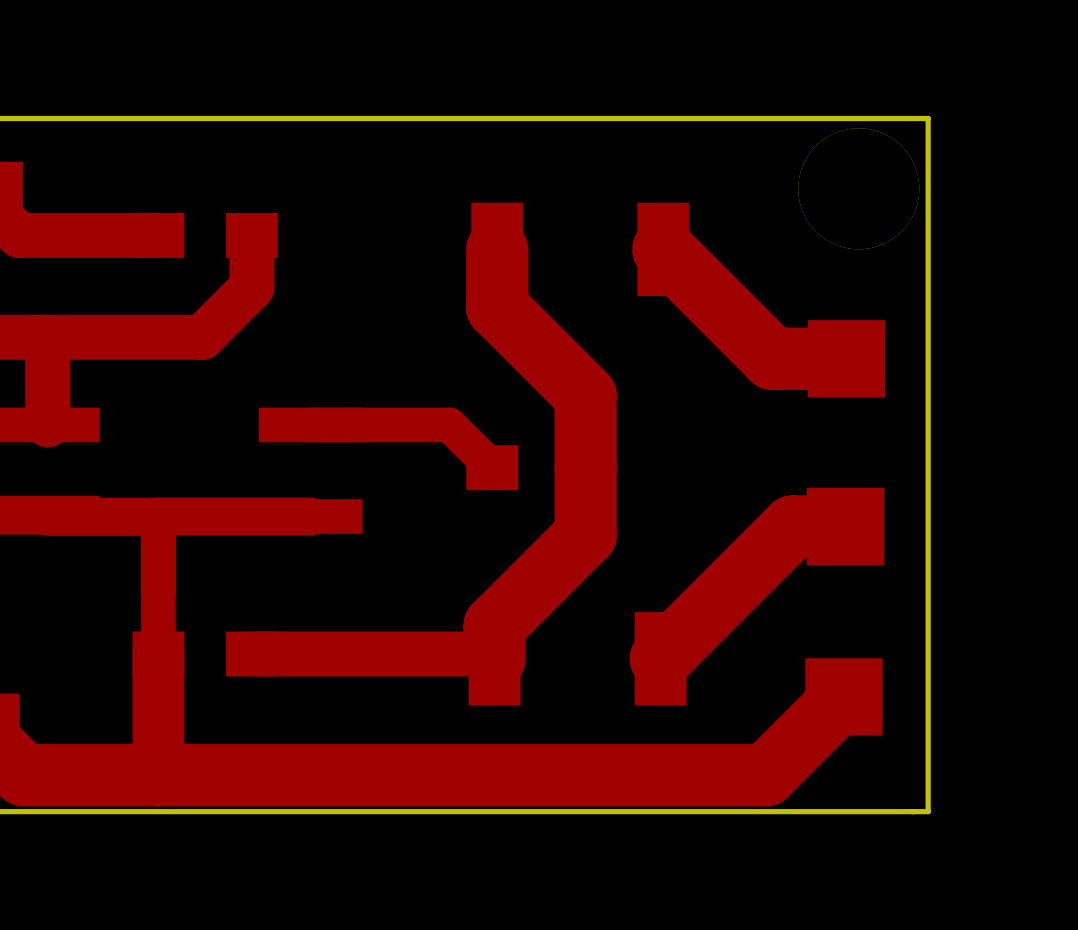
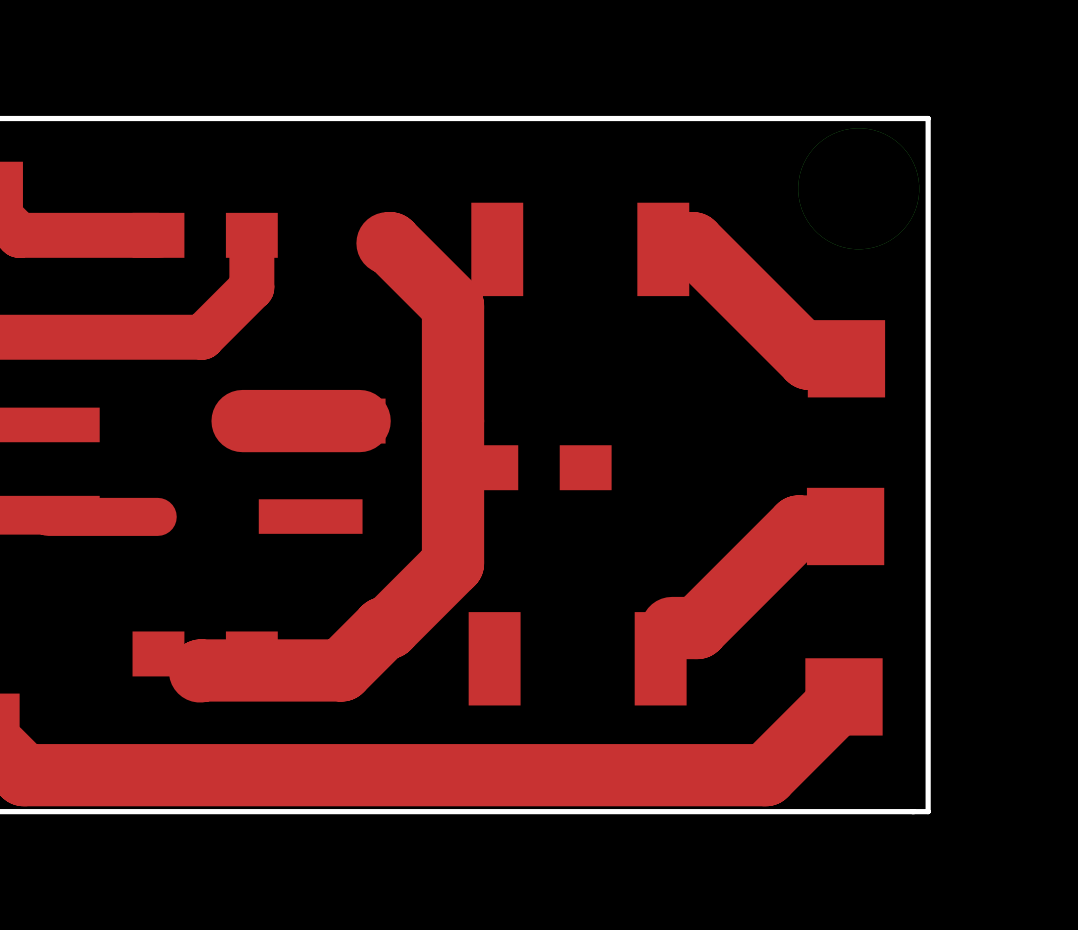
top track: none -> (387, 243) (390, 243) (453, 305) (453, 563) (388, 628) (383, 628) (341, 670) (200, 671)
top track: (497, 249) (497, 307) (585, 395) (585, 534) (494, 625) (494, 658) -> none
top track: (663, 249) (772, 358) (808, 358) -> (671, 243) (693, 243) (808, 358)
top track: (43, 337) (47, 341) (47, 424) -> none
top track: none -> (359, 421) (242, 421)
top track: (310, 424) (449, 424) (492, 467) -> none
top track: (157, 514) (157, 775) -> none
top track: (310, 516) (158, 516) -> none
top track: (798, 526) (792, 526) (660, 658) -> (798, 526) (697, 628) (672, 628)
top track: (494, 653) (256, 653) -> none

